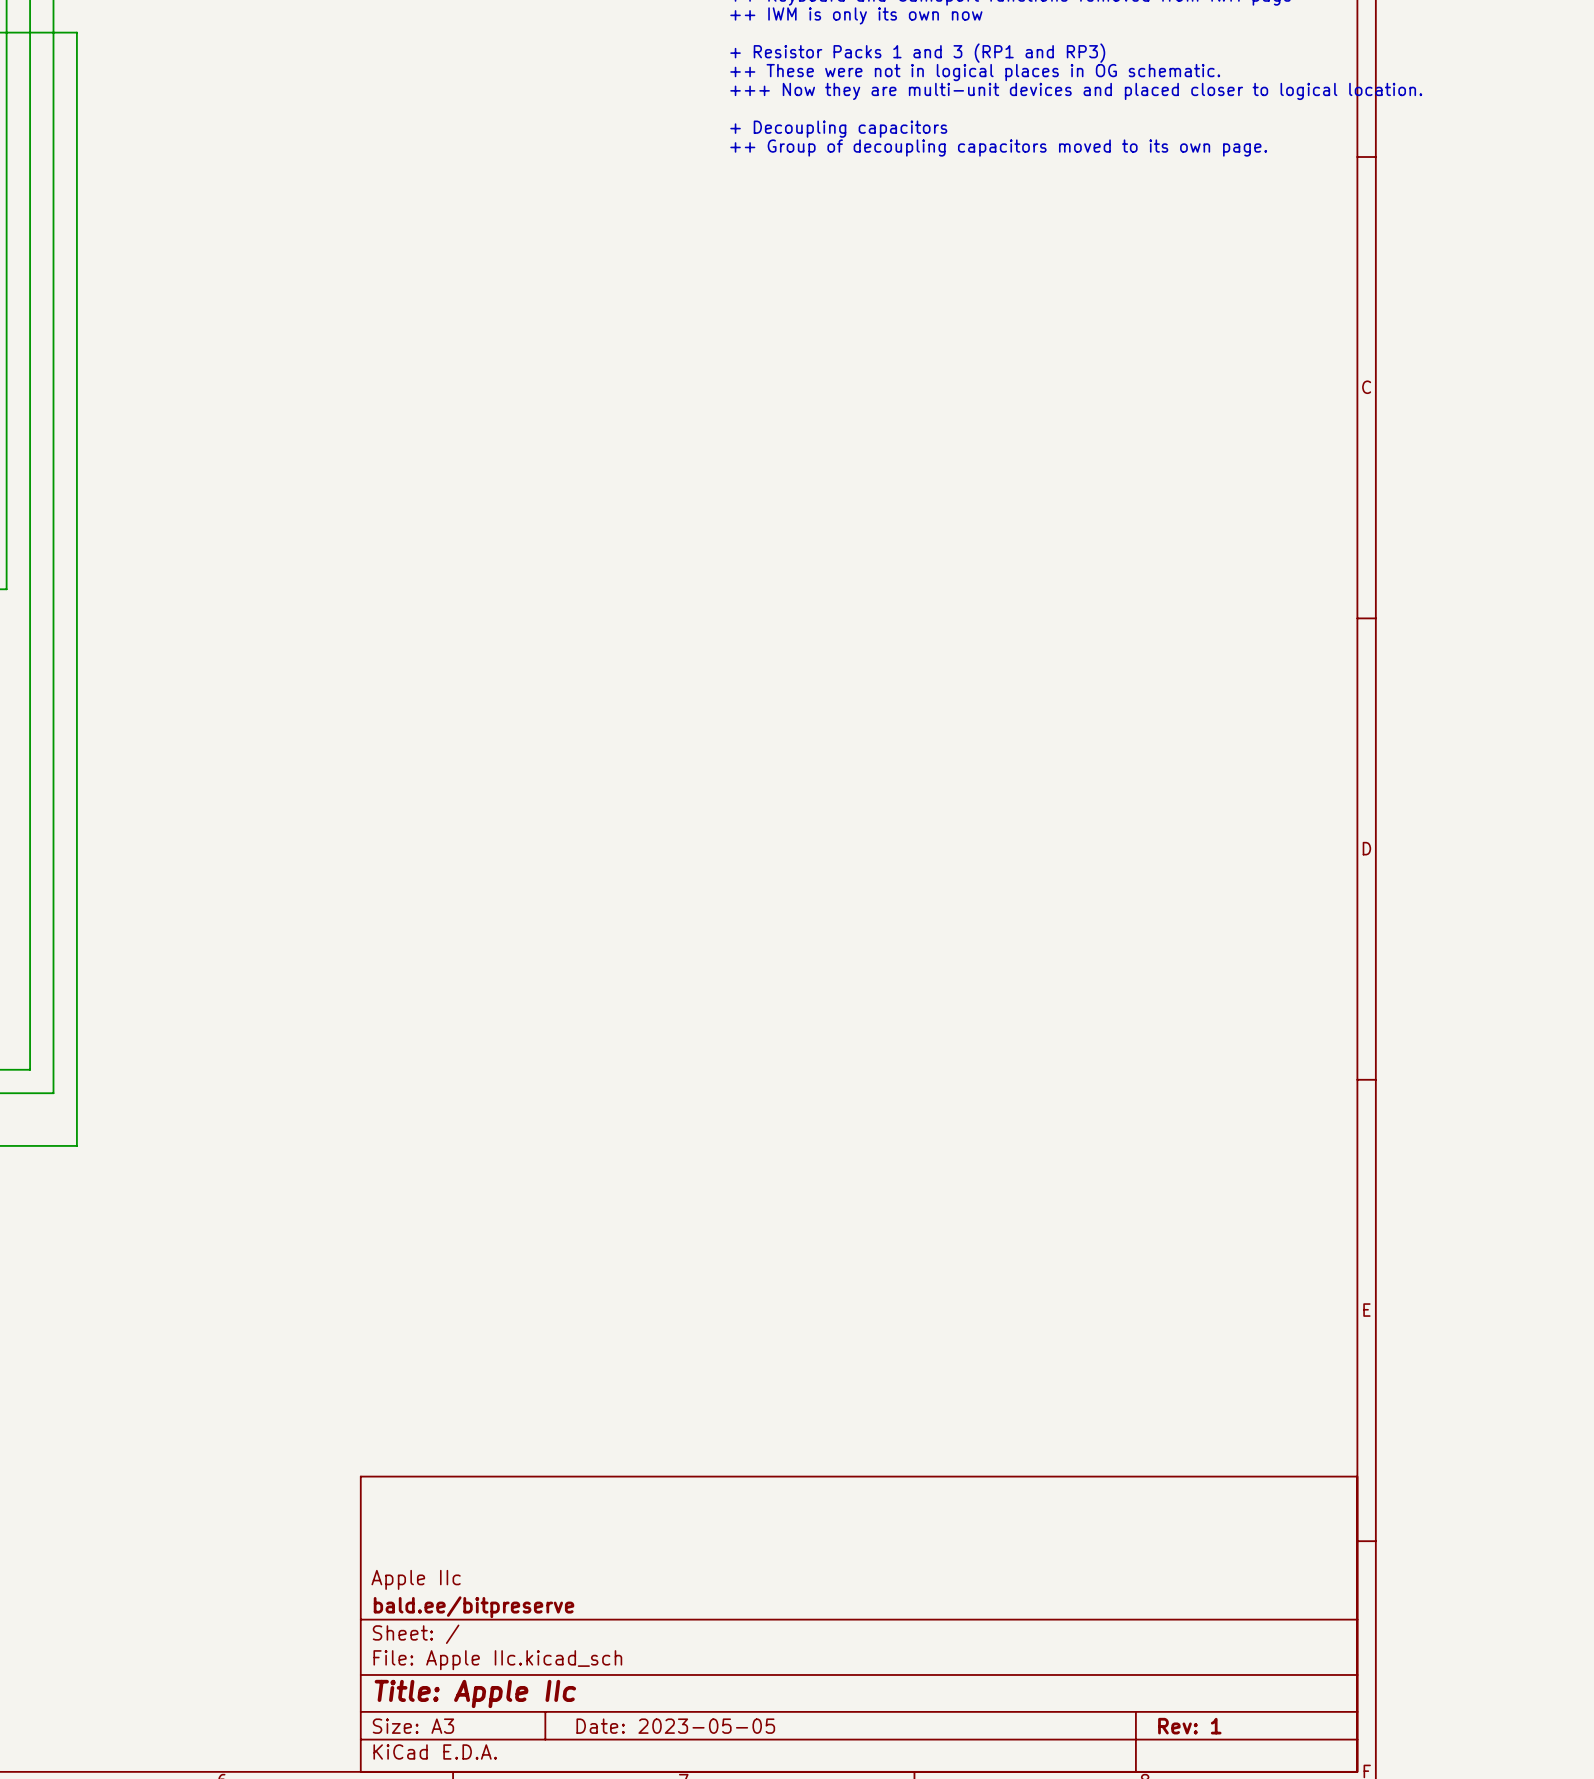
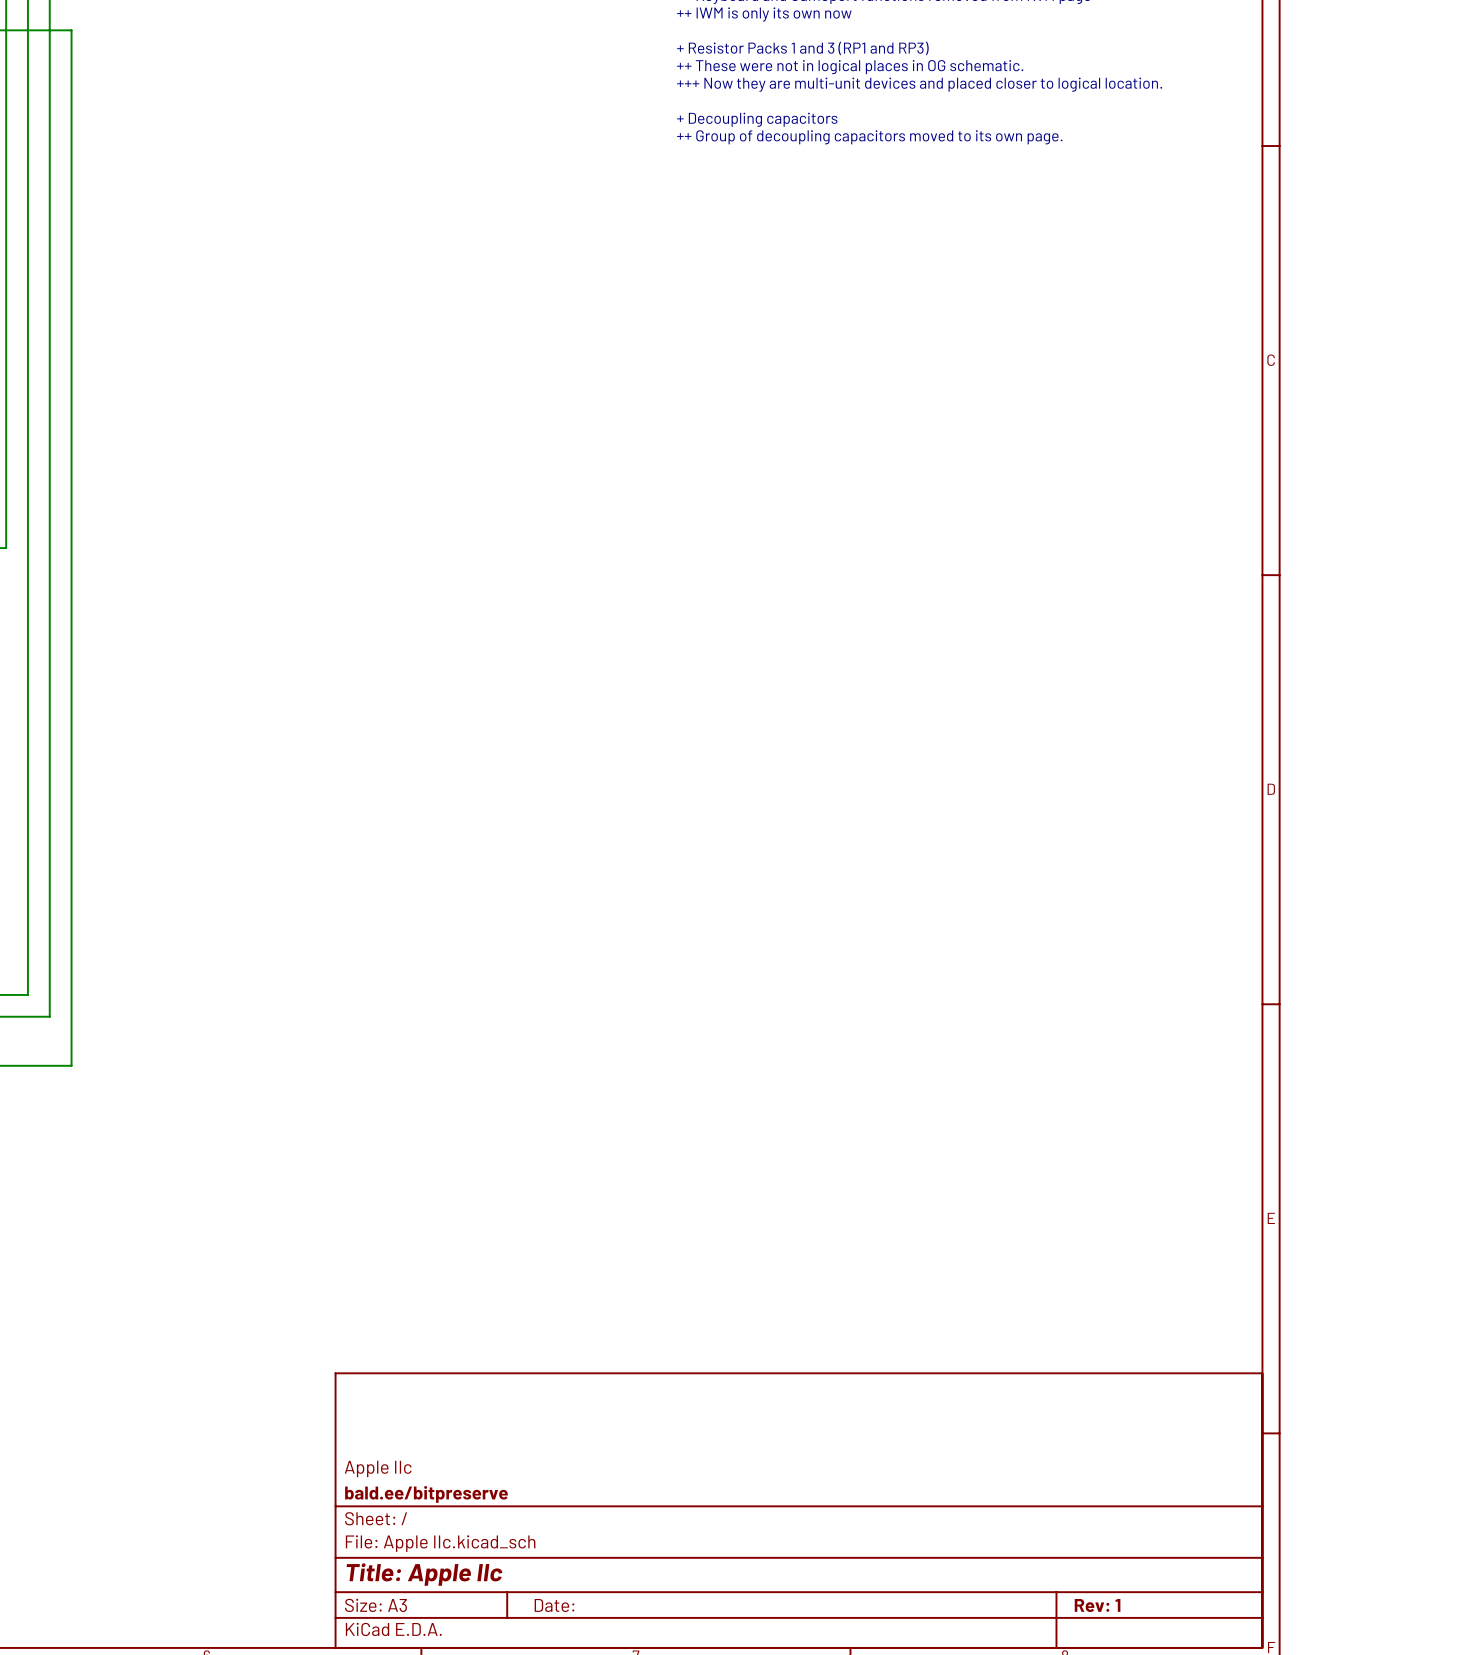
title block: Date: 2023-05-05 (675, 1726) -> Date: (554, 1605)

